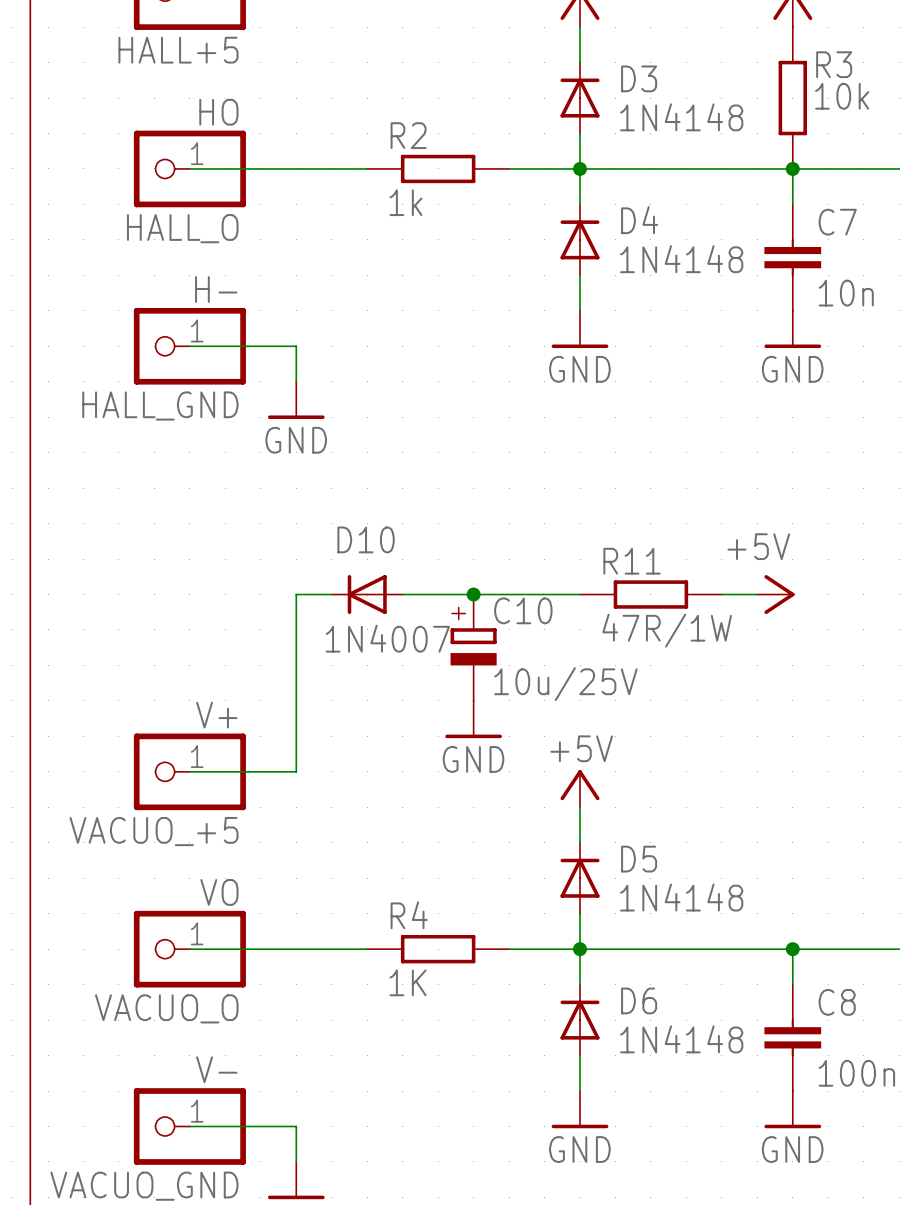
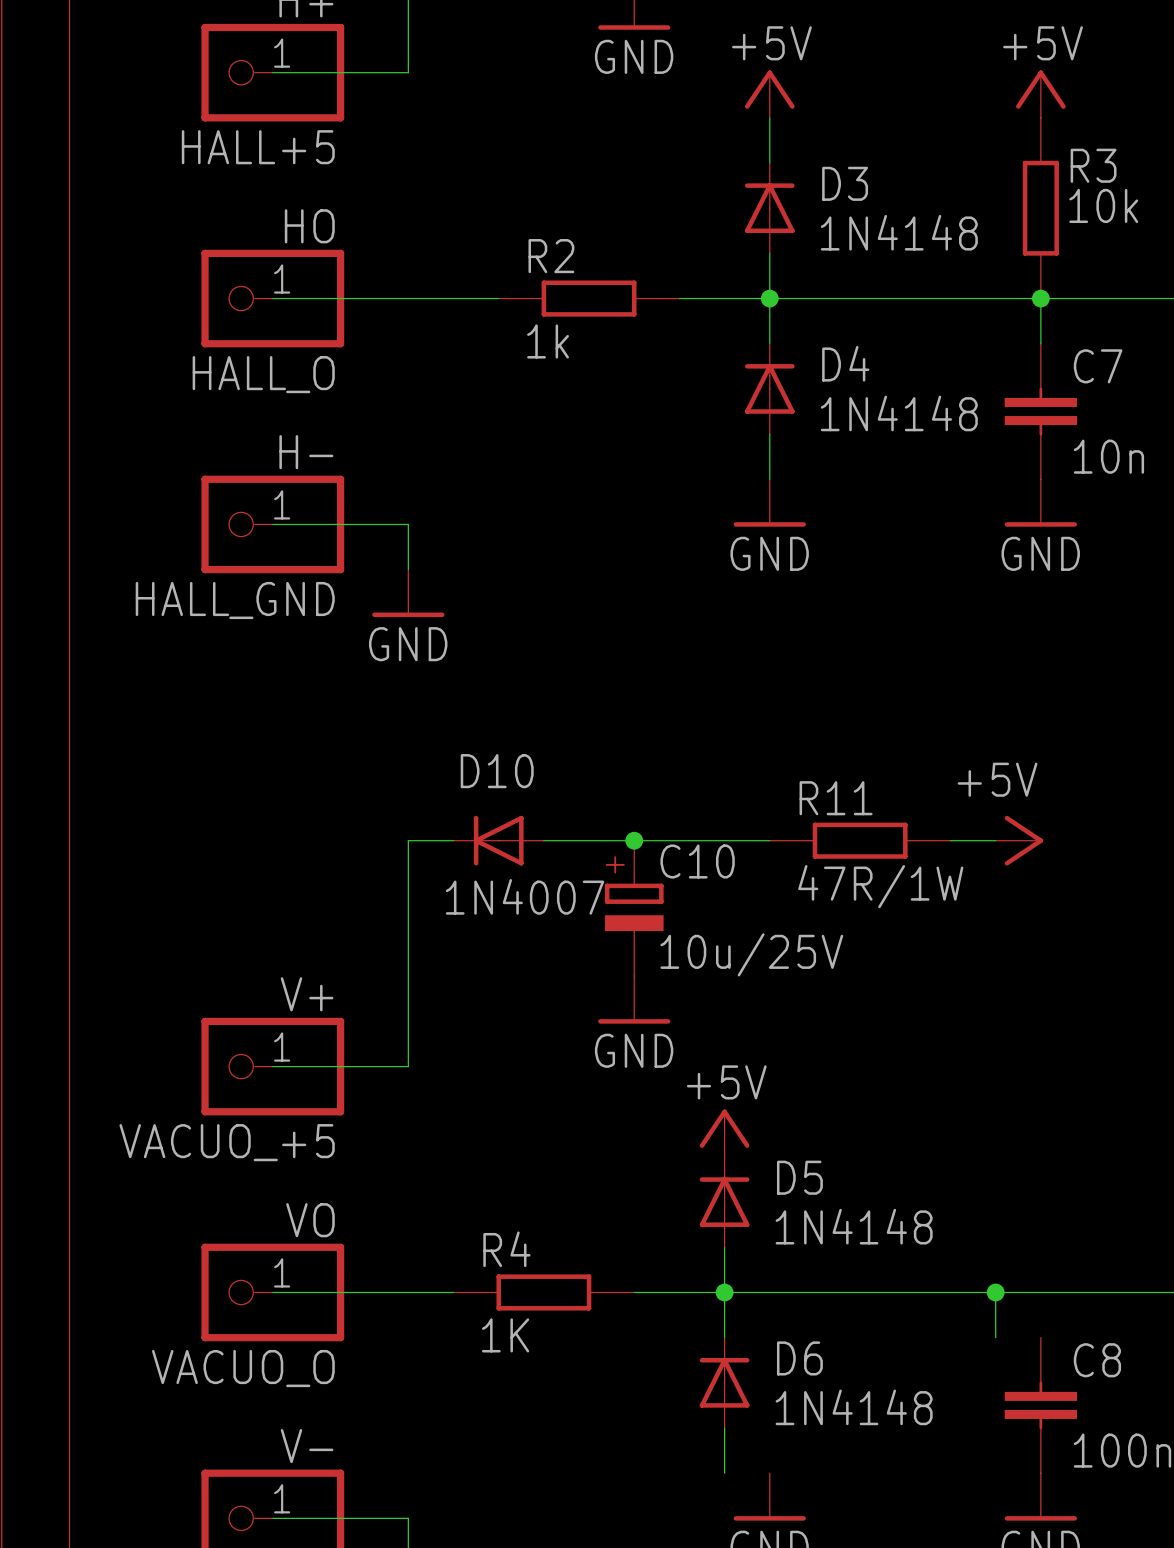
power symbol position: +5V (580, 788) -> +5V (724, 1133)
wire: (580, 807) (580, 842) -> none
D5 position: (580, 878) -> (724, 1202)
wire: (580, 913) (580, 984) -> (724, 1247) (724, 1337)
R4 position: (438, 949) -> (543, 1292)
junction position: (580, 949) -> (724, 1292)
wire: (792, 949) (792, 984) -> (995, 1292) (995, 1337)
junction position: (792, 949) -> (995, 1292)
D6 position: (580, 1020) -> (724, 1382)
wire: (580, 1055) (580, 1091) -> (724, 1428) (724, 1473)

